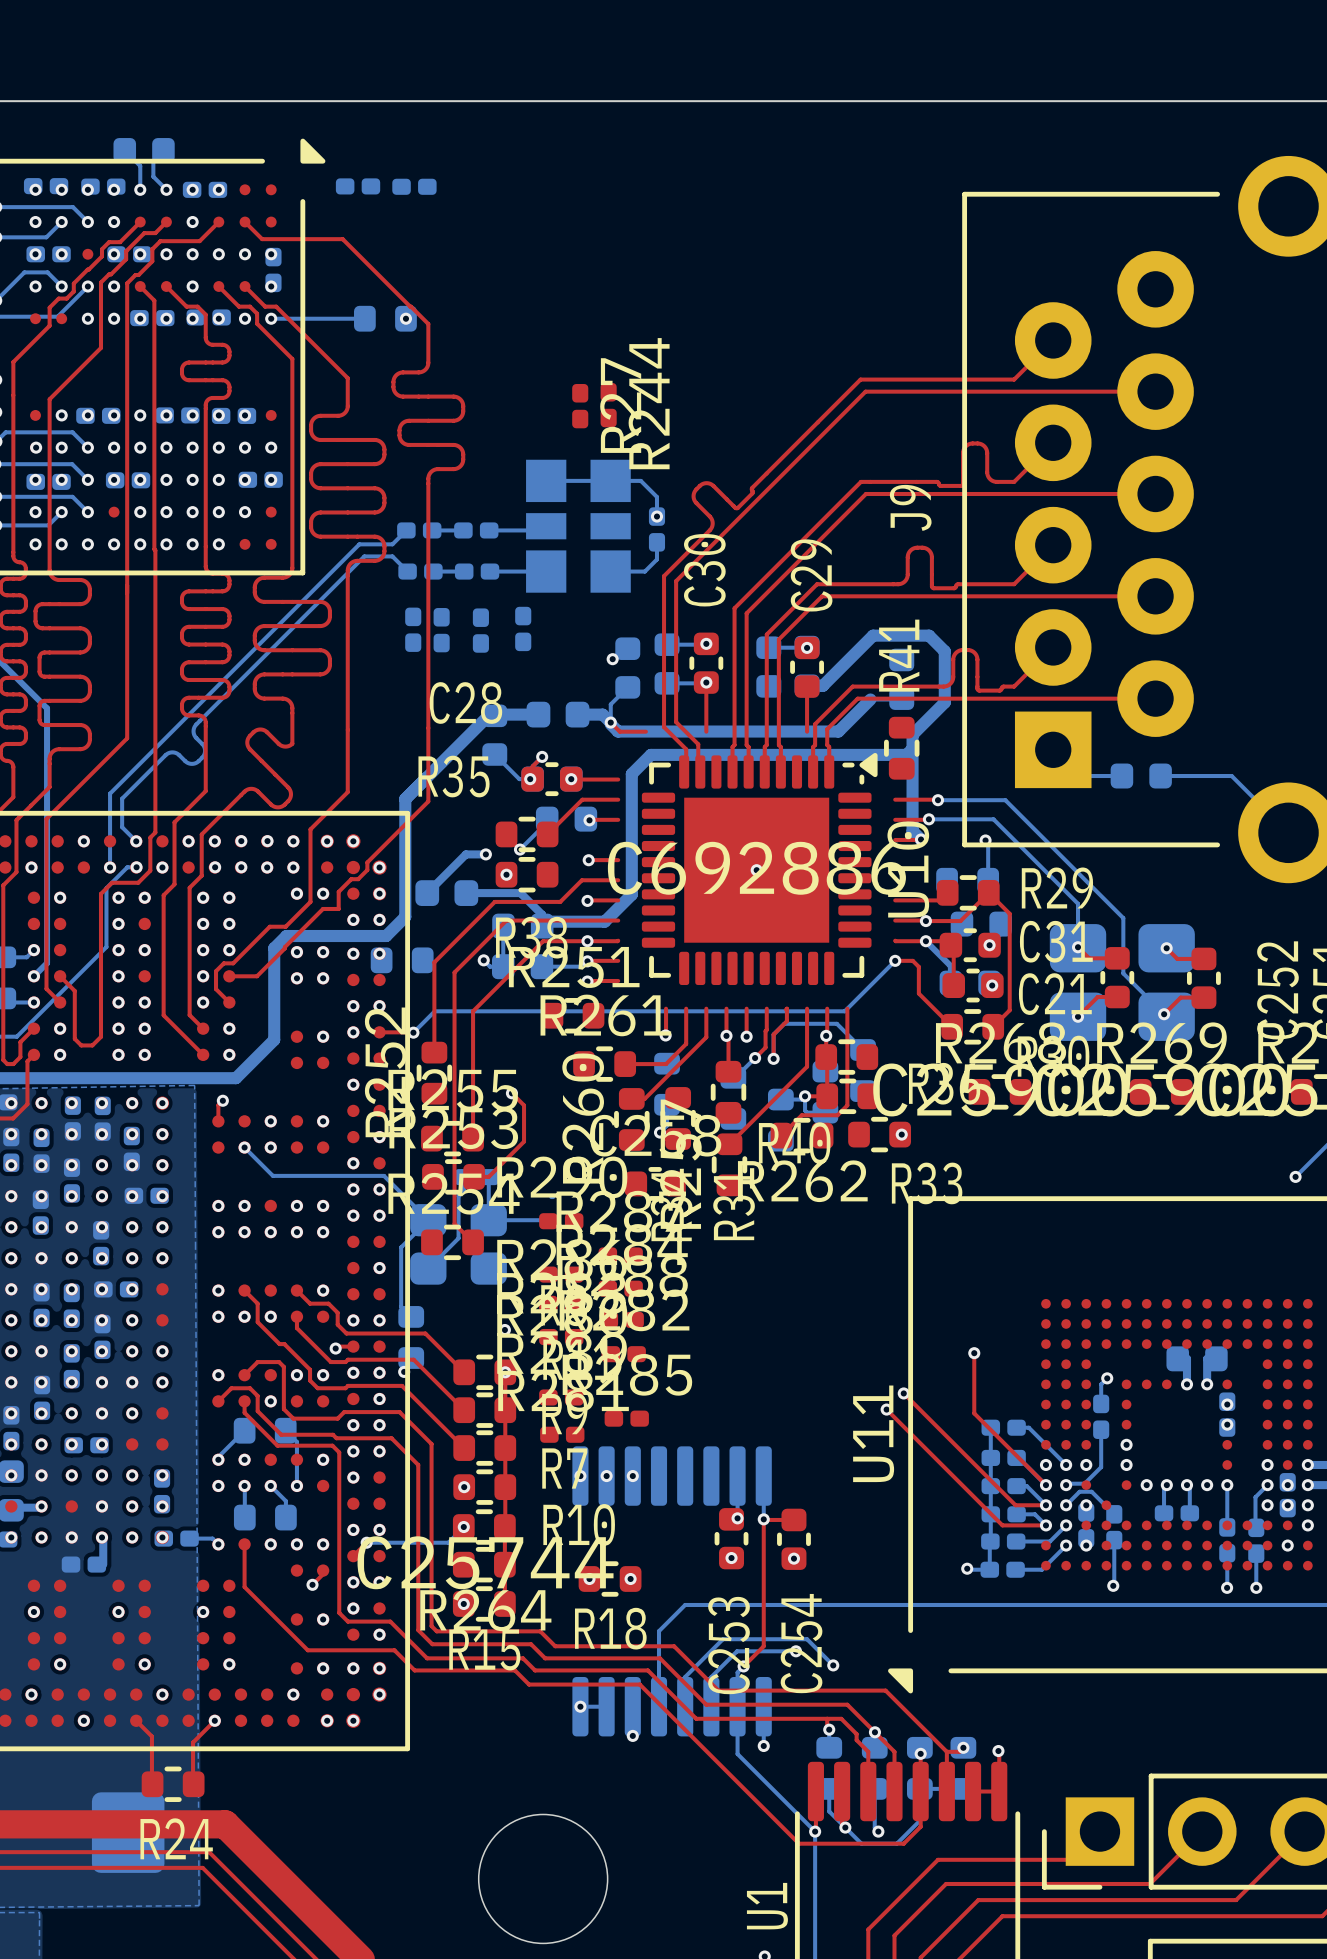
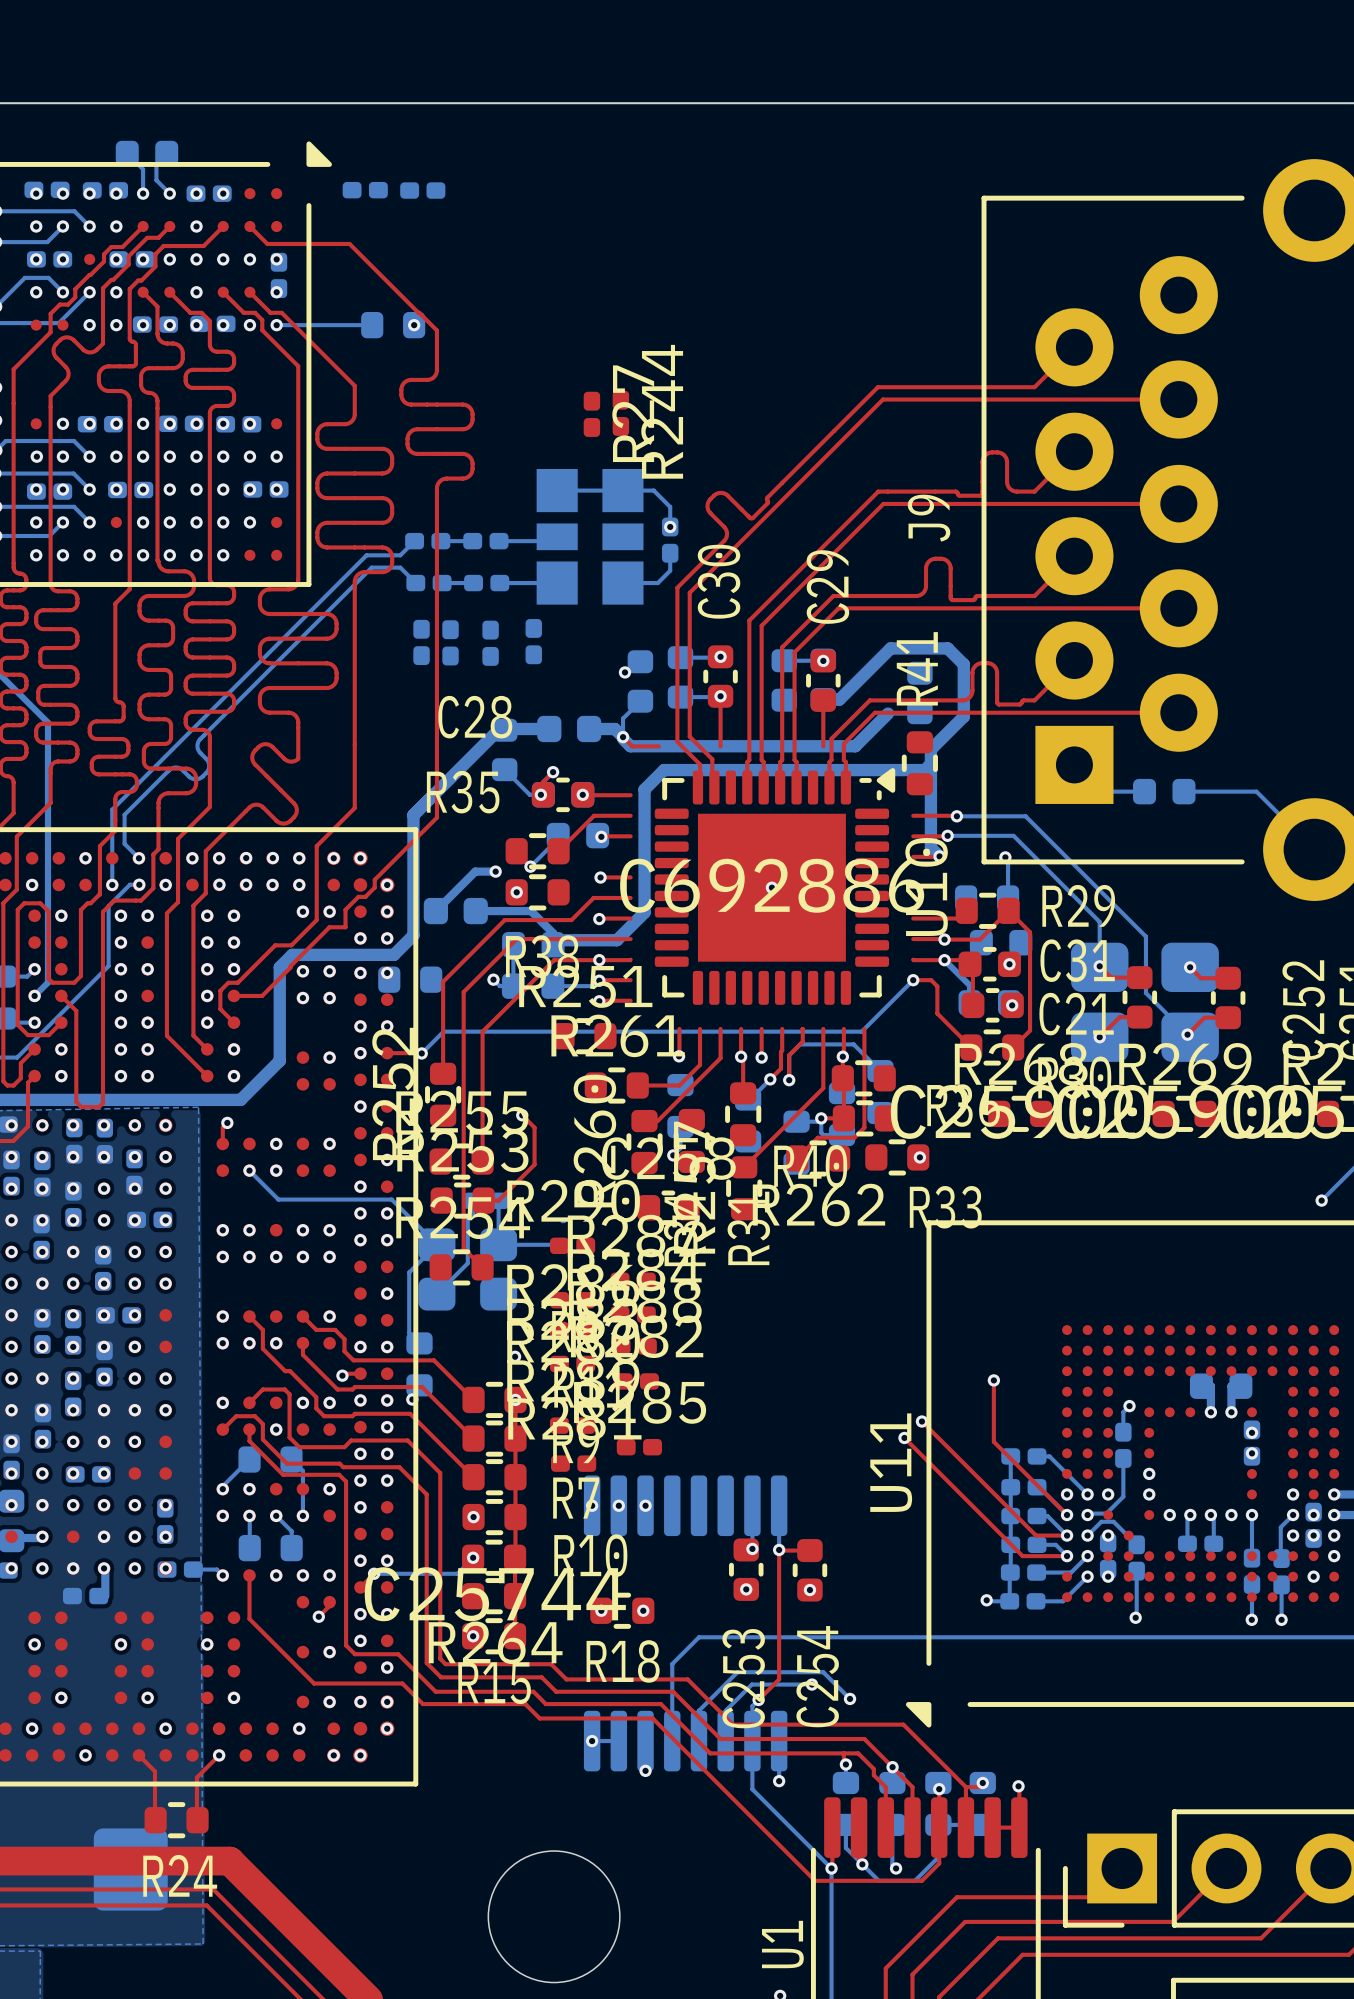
top track: (154, 327) (154, 393) -> (157, 333) (161, 341) (178, 345) (182, 353) (182, 361) (177, 367) (148, 368) (142, 372) (142, 388) (154, 394) (157, 401)
top track: (127, 331) (127, 392) -> (129, 338) (135, 343) (135, 365) (105, 366) (101, 370) (98, 376) (99, 384) (102, 388) (124, 391) (128, 395) (129, 400)
top track: (100, 336) (100, 347) (49, 399) -> (103, 343) (95, 350) (90, 352) (84, 350) (69, 337) (62, 338) (55, 344) (53, 349) (54, 354) (66, 367) (68, 375) (66, 379) (50, 396) (50, 407)
top track: (155, 550) (155, 787) -> (158, 561) (160, 566) (165, 570) (185, 571) (190, 573) (193, 578) (194, 587) (191, 592) (187, 595) (147, 596) (142, 598) (139, 603) (139, 613) (143, 618) (147, 620) (167, 620) (171, 623) (173, 627) (173, 638) (170, 643) (145, 645) (139, 652) (139, 662) (143, 667) (147, 669) (166, 670) (171, 676) (171, 689) (168, 693) (146, 694) (140, 700) (139, 711) (143, 717) (147, 719) (166, 719) (171, 725) (169, 741) (165, 743) (146, 745) (143, 750) (143, 762) (146, 766) (150, 768) (189, 769) (194, 773) (196, 778) (195, 786) (191, 791) (165, 793) (160, 796) (158, 803)
top track: (49, 570) (51, 576) (56, 579) (84, 580) (89, 589) (88, 598) (83, 603) (41, 604) (35, 609) (35, 622) (39, 627) (82, 628) (87, 631) (89, 636) (88, 647) (83, 651) (43, 652) (39, 656) (39, 672) (42, 675) (82, 676) (87, 679) (89, 685) (88, 695) (83, 700) (43, 700) (40, 703) (39, 720) (42, 724) (82, 725) (87, 727) (89, 733) (89, 742) (85, 747) (56, 749) (51, 752) (49, 758) -> (50, 581) (54, 590) (72, 591) (77, 598) (77, 605) (73, 609) (42, 610) (36, 616) (36, 624) (40, 628) (71, 629) (77, 635) (77, 642) (73, 647) (44, 648) (40, 652) (40, 662) (42, 666) (71, 667) (77, 673) (77, 680) (73, 685) (43, 685) (38, 690) (38, 699) (41, 704) (71, 704) (77, 711) (76, 719) (72, 723) (42, 723) (36, 728) (36, 737) (40, 742) (70, 742) (77, 747) (75, 759) (54, 762) (51, 766) (50, 774)
top track: (127, 577) (127, 738) (46, 819) (46, 988) (60, 1002) -> (129, 589) (115, 603) (115, 698) (123, 704) (123, 718) (120, 721) (94, 721) (89, 727) (90, 734) (94, 738) (122, 739) (128, 744) (127, 752) (124, 756) (94, 758) (91, 762) (93, 771) (97, 774) (131, 774) (136, 781) (134, 790) (119, 792) (115, 797) (115, 830) (99, 846) (99, 894)
top track: none -> (99, 894) (80, 909) (80, 976) (74, 982) (52, 982) (48, 978) (48, 911) (40, 903) (24, 903) (17, 909) (17, 1024) (28, 1035) (48, 1035) (61, 1022)
top track: (100, 1036) (92, 1045) (81, 1045) (74, 1038) -> (103, 1057) (103, 1102) (98, 1107) (81, 1107) (76, 1101) (76, 1059)

